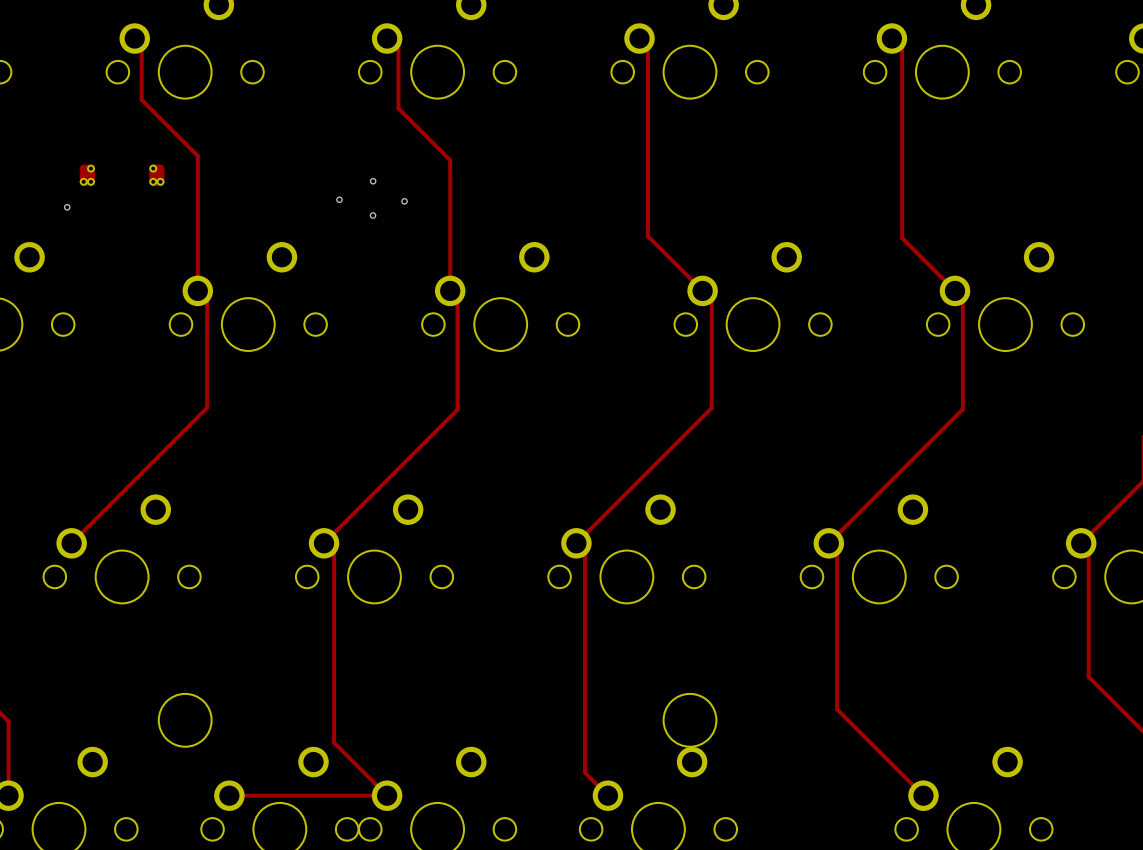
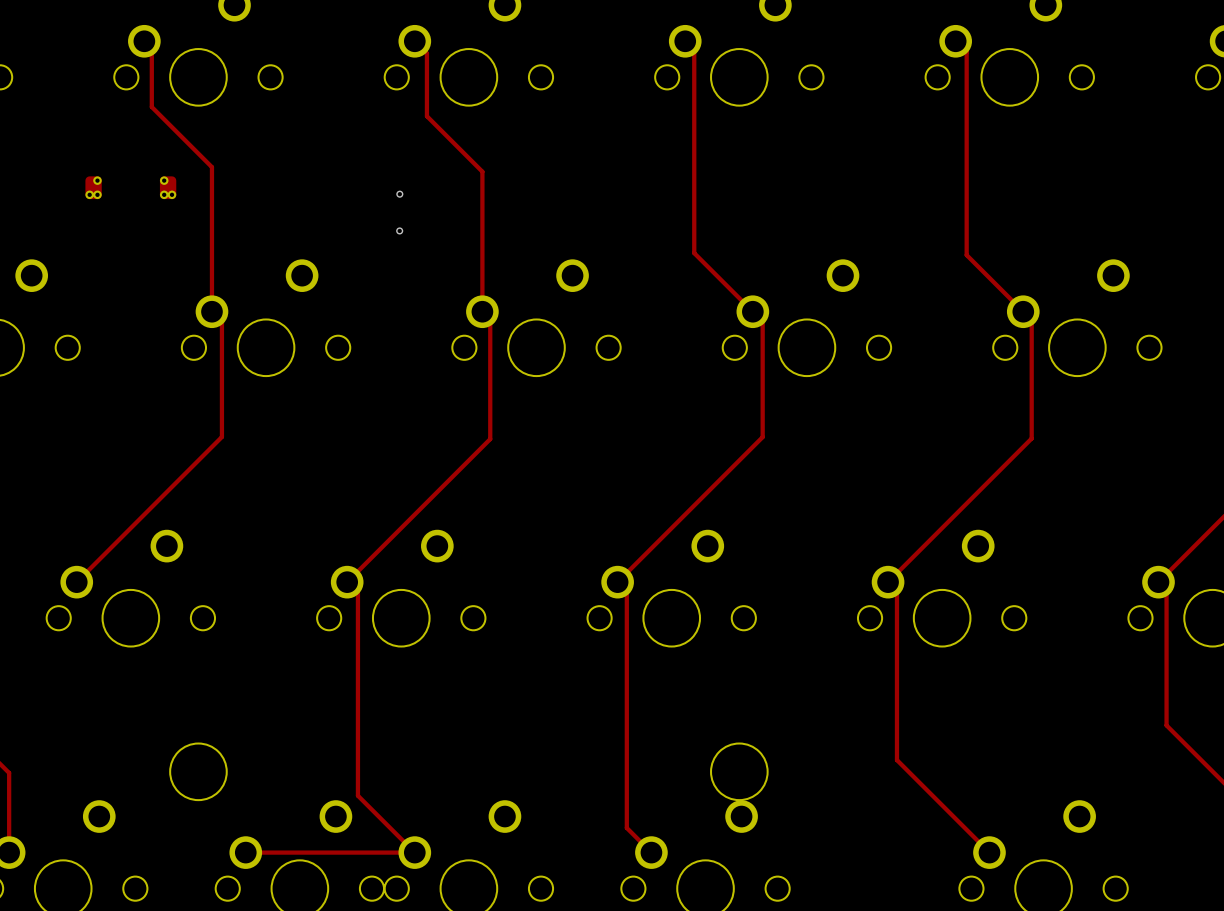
via: (339, 199) -> none
via: (404, 201) -> none
via: (67, 207) -> none

